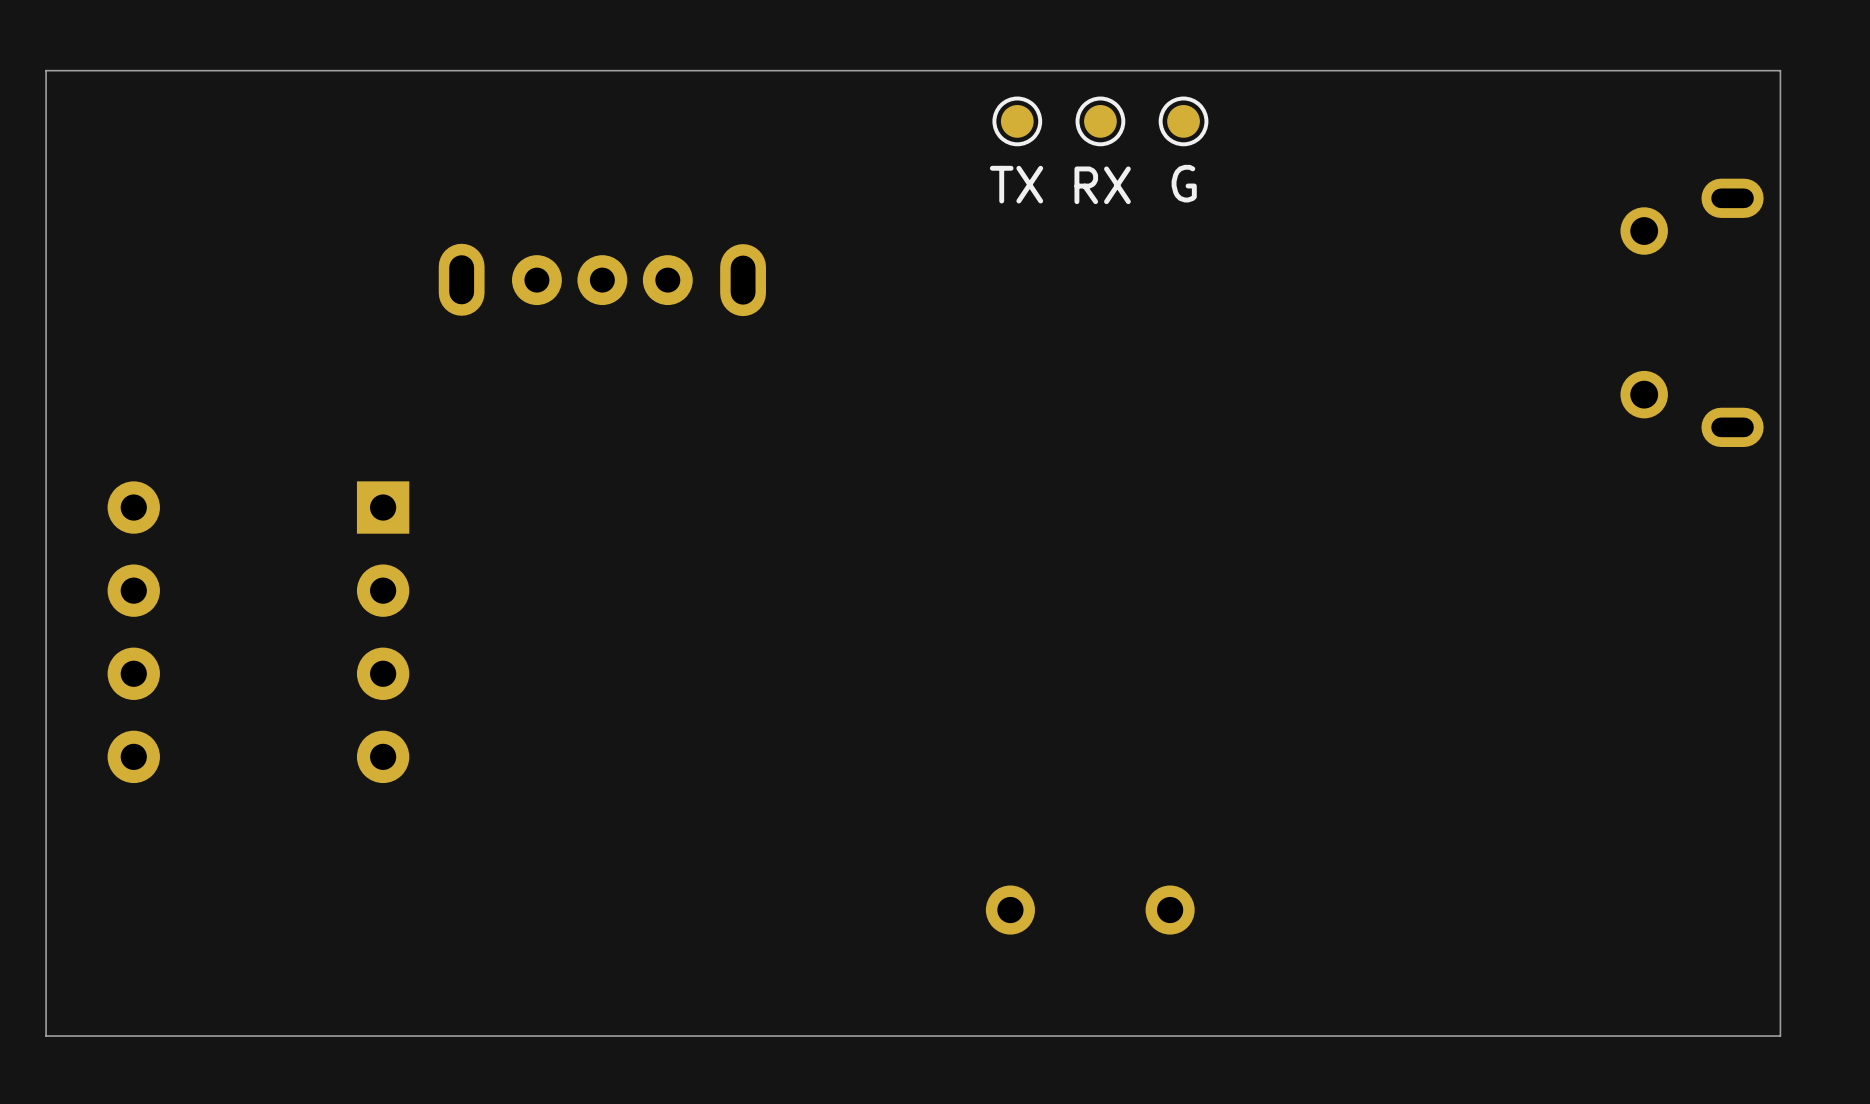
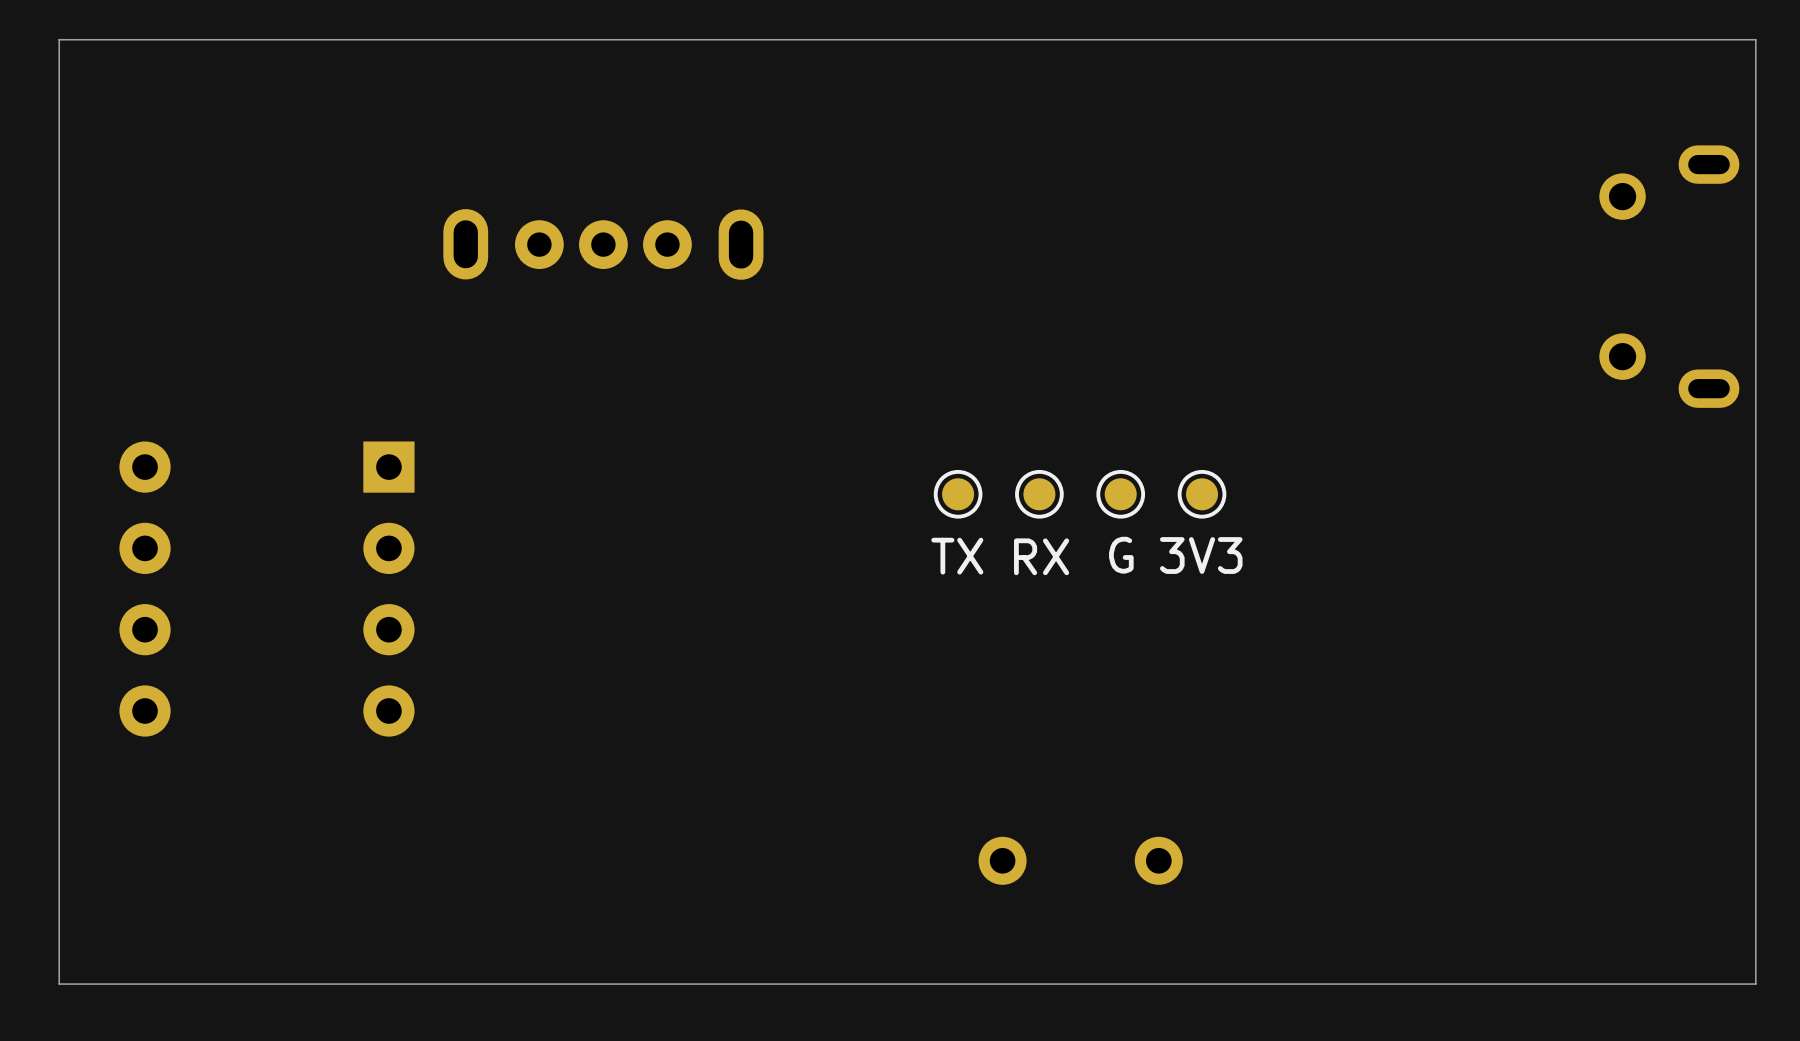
TX position: (1017, 121) -> (958, 494)
RX position: (1100, 121) -> (1039, 494)
G position: (1183, 121) -> (1120, 494)
3V3: none -> (1202, 494)

